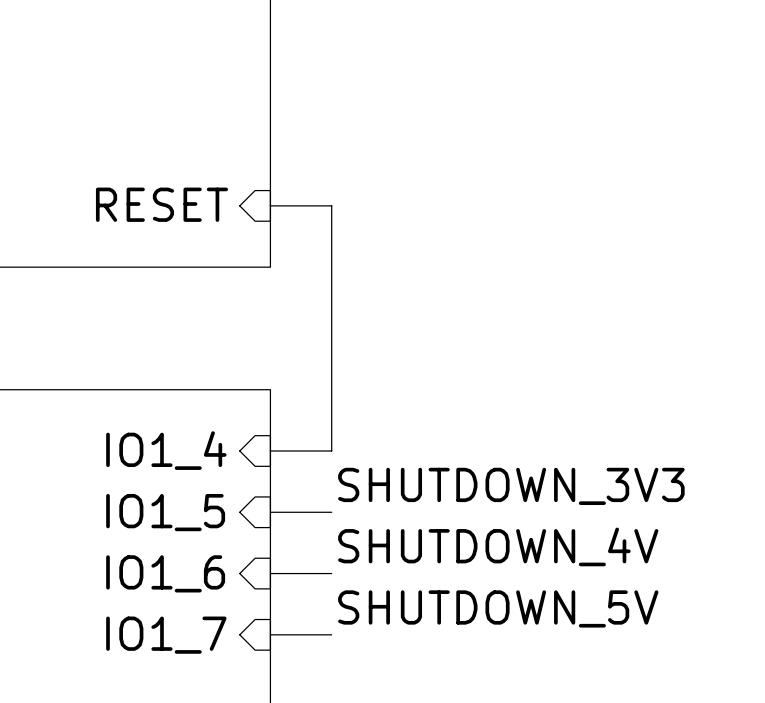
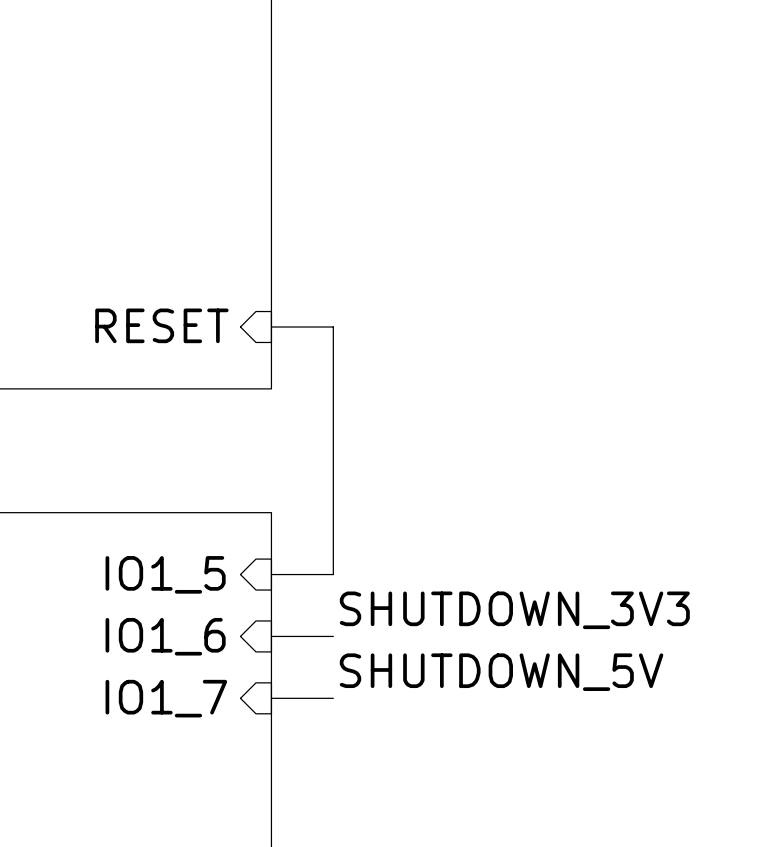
sheet pin: IO1_4 (166, 450) -> IO1_5 (165, 574)
sheet pin: IO1_5 (165, 512) -> IO1_6 (165, 636)
label: SHUTDOWN_4V (498, 546) -> SHUTDOWN_5V (501, 672)
sheet pin: IO1_6 (165, 573) -> IO1_7 (166, 698)
label: SHUTDOWN_5V (498, 608) -> none
wire: (270, 634) (331, 634) -> none
sheet pin: IO1_7 (166, 635) -> none

